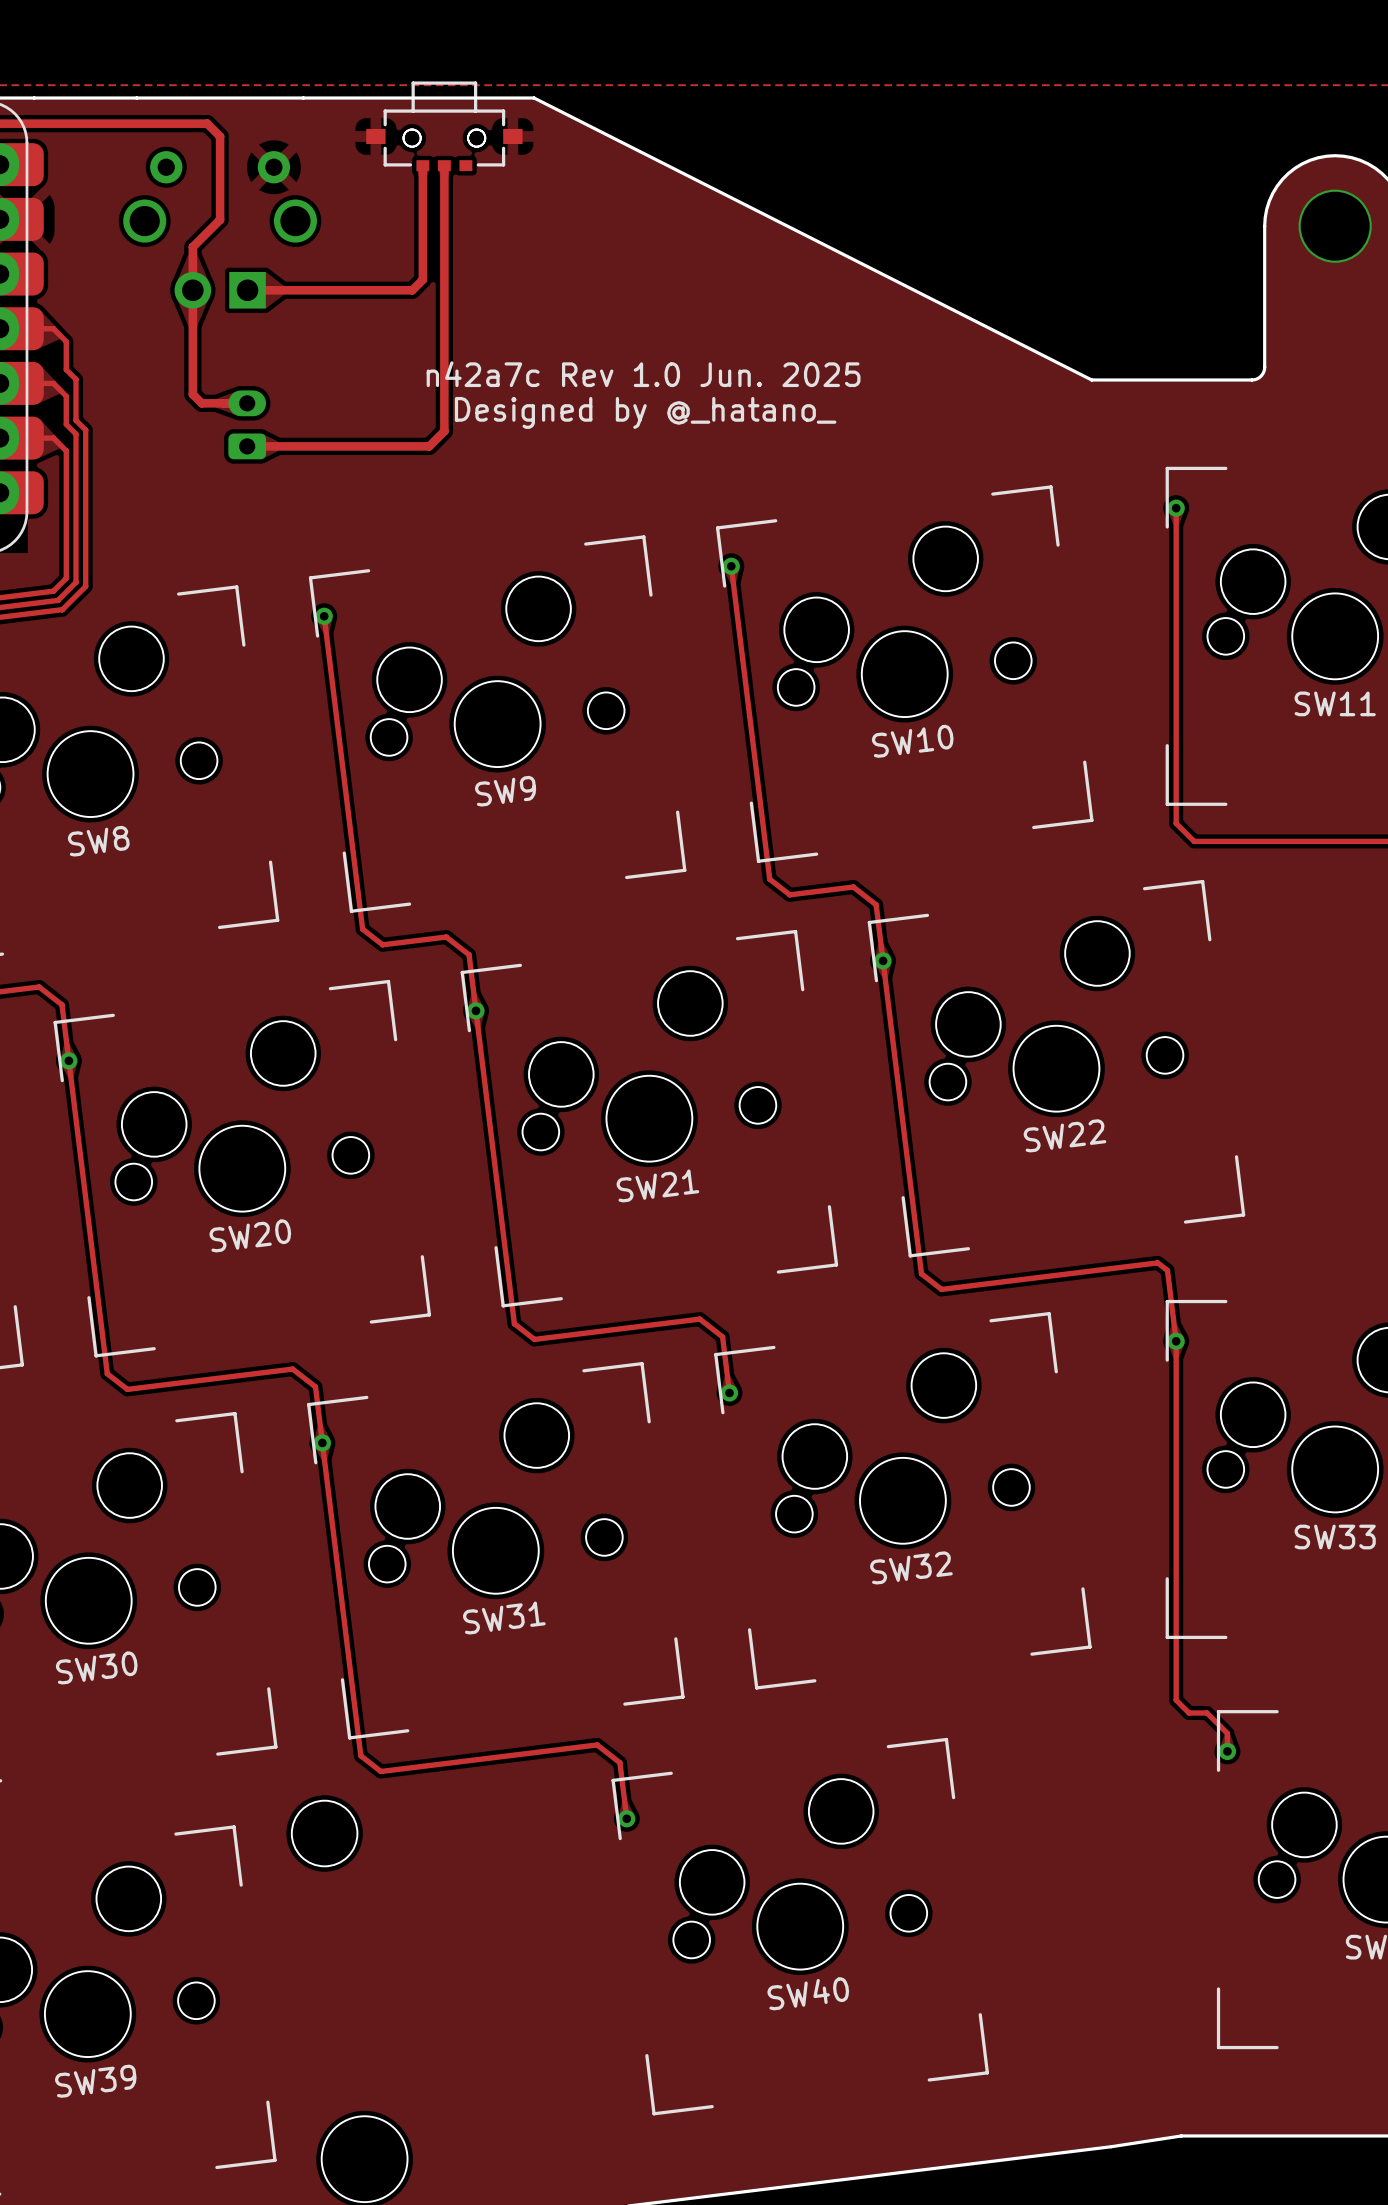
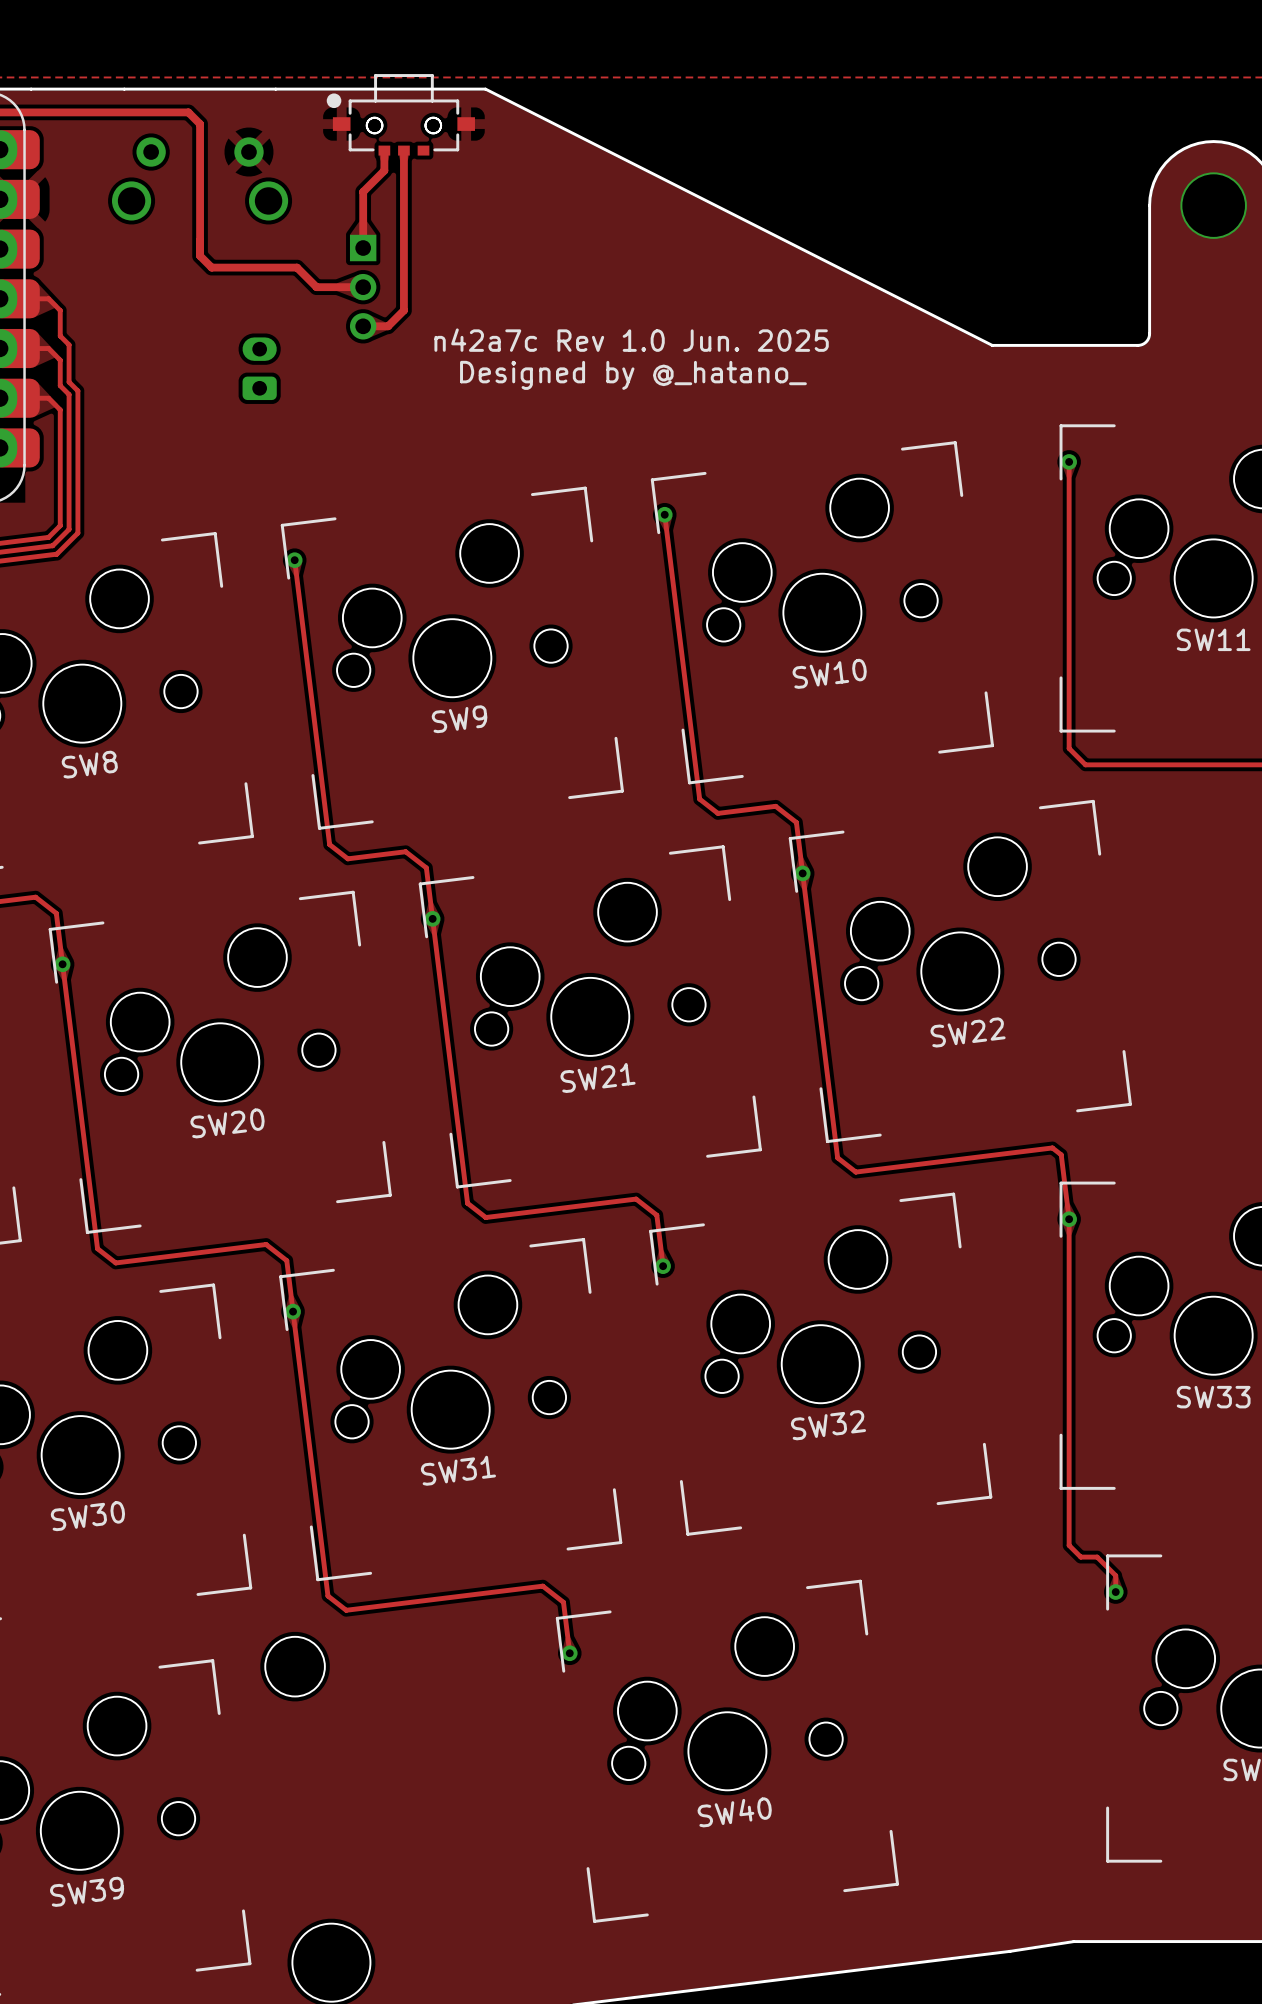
drawing: none -> [326, 93, 342, 109]
track: (422, 187) (422, 279) (412, 290) (247, 290) -> (384, 170) (363, 191) (363, 238)
track: (220, 219) (192, 247) (192, 394) (201, 403) (247, 403) -> (200, 199) (200, 255) (211, 267) (297, 267) (316, 287) (363, 287)
part: (220, 290) -> none
part: none -> (363, 287)
track: (444, 341) (444, 431) (429, 446) (247, 446) -> (403, 310) (388, 326) (363, 326)
text position: n42a7c Rev 1.0 Jun. 2025 (643, 374) -> n42a7c Rev 1.0 Jun. 2025 (631, 340)
text position: Designed by @_hatano_ (645, 412) -> Designed by @_hatano_ (633, 375)
part position: (247, 424) -> (259, 368)

